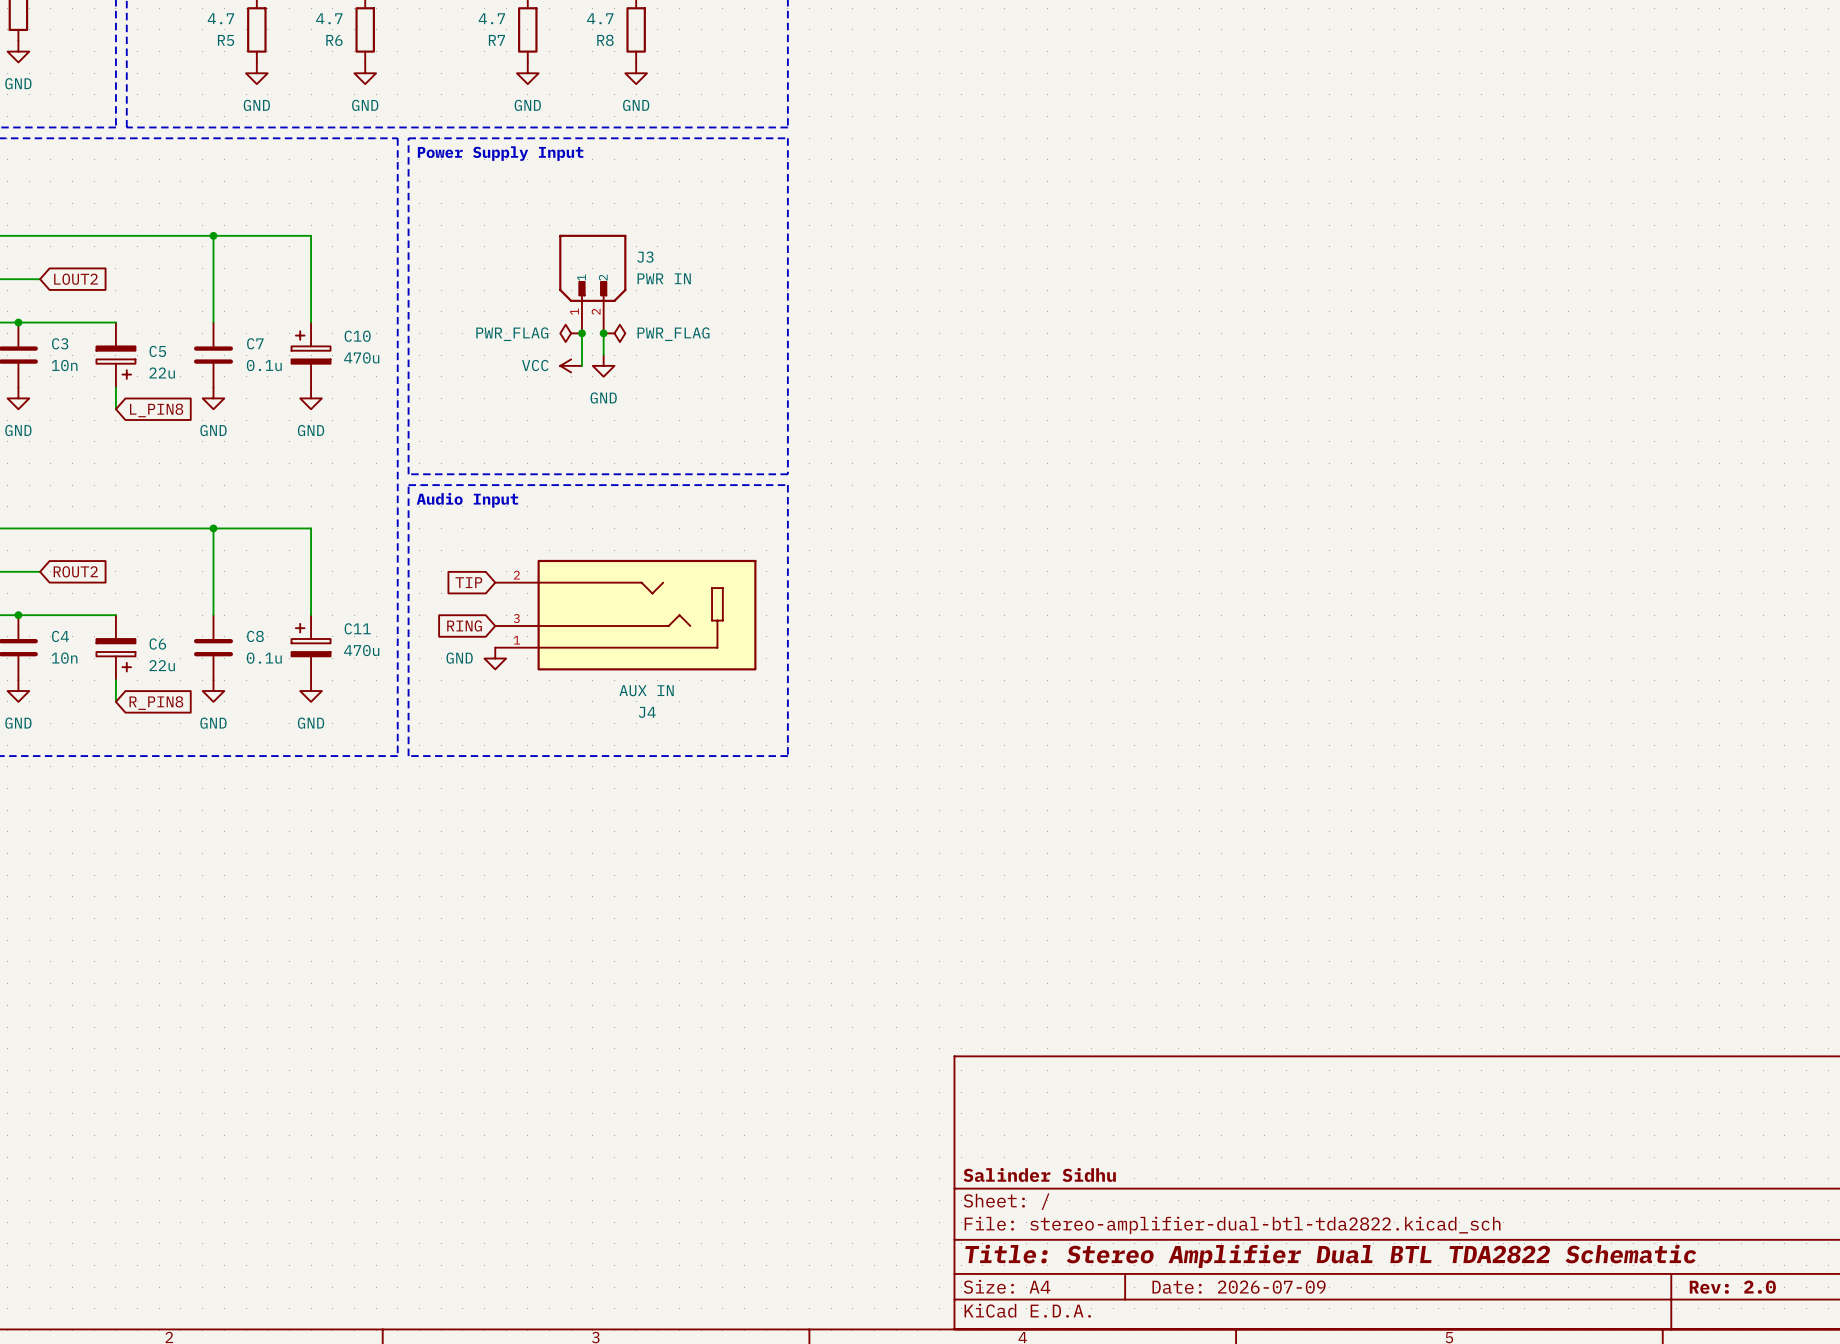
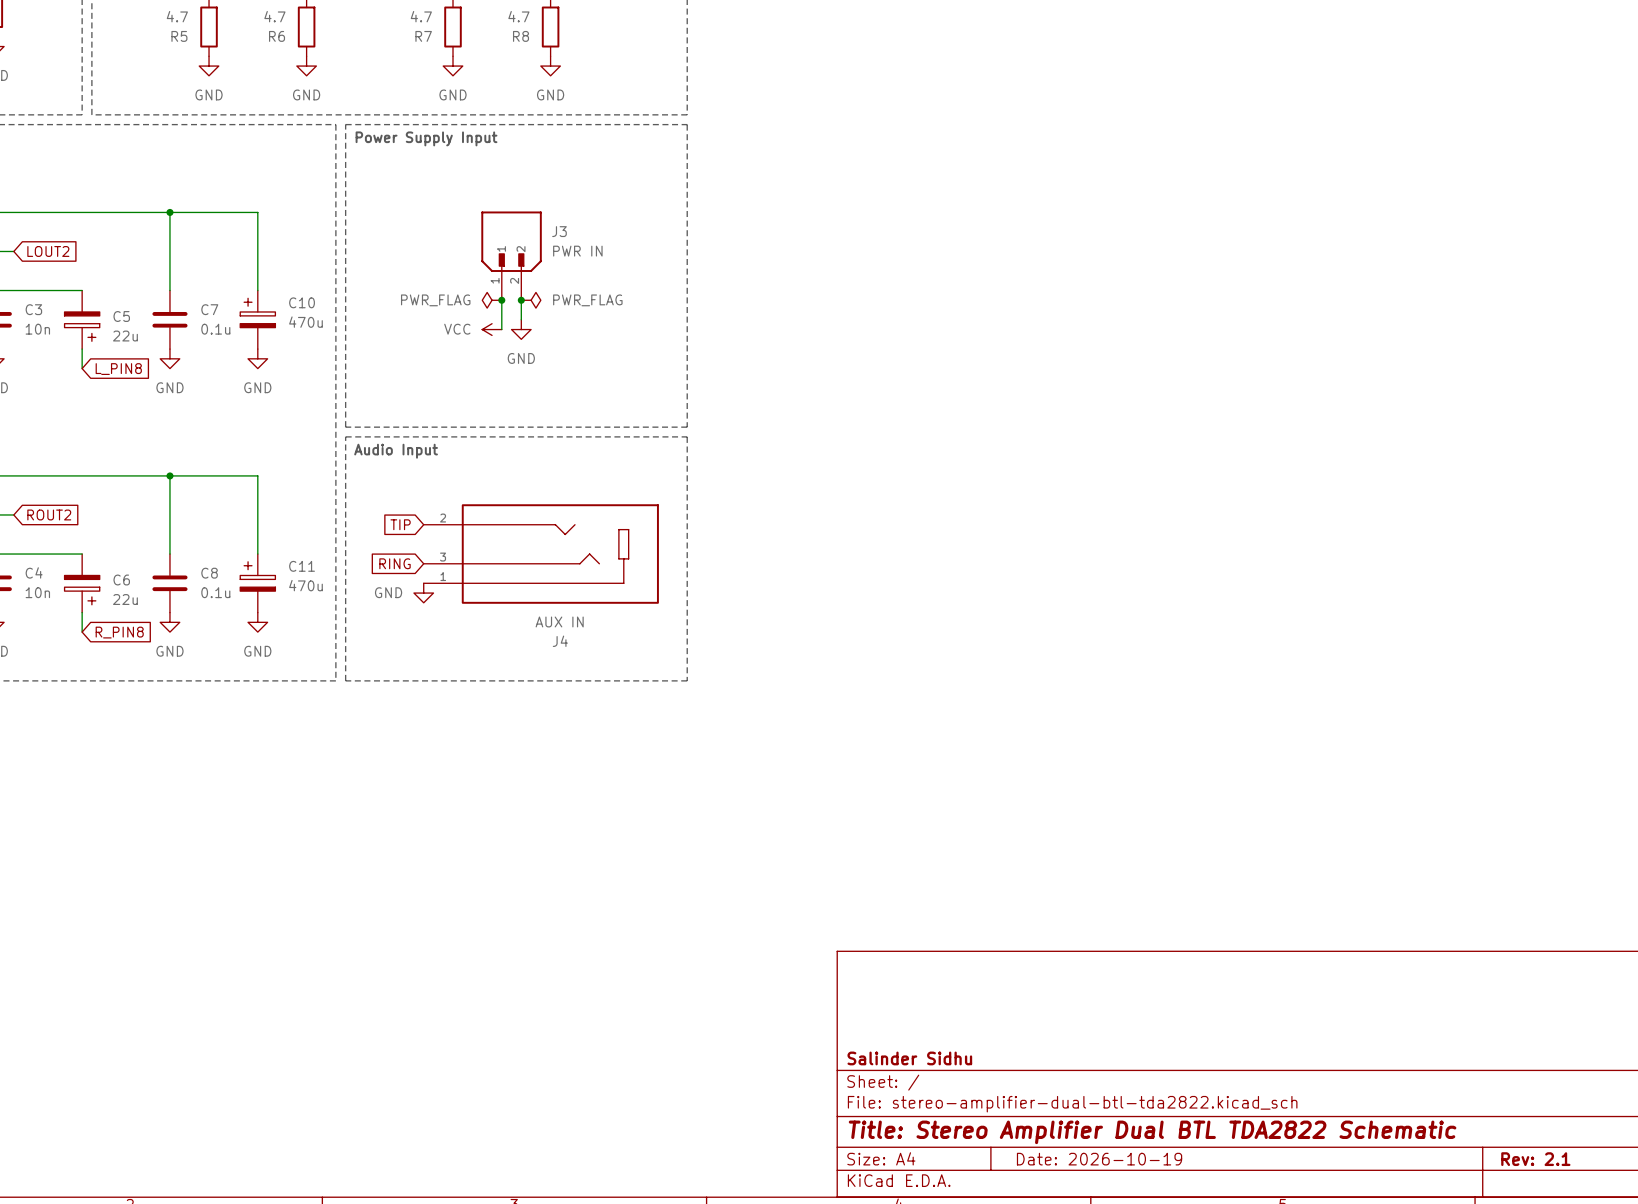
title block: Date: 2026-07-09 (1239, 1287) -> Date: 2026-10-19 (1099, 1159)
title block: Rev: 2.0 (1732, 1287) -> Rev: 2.1 (1535, 1159)

